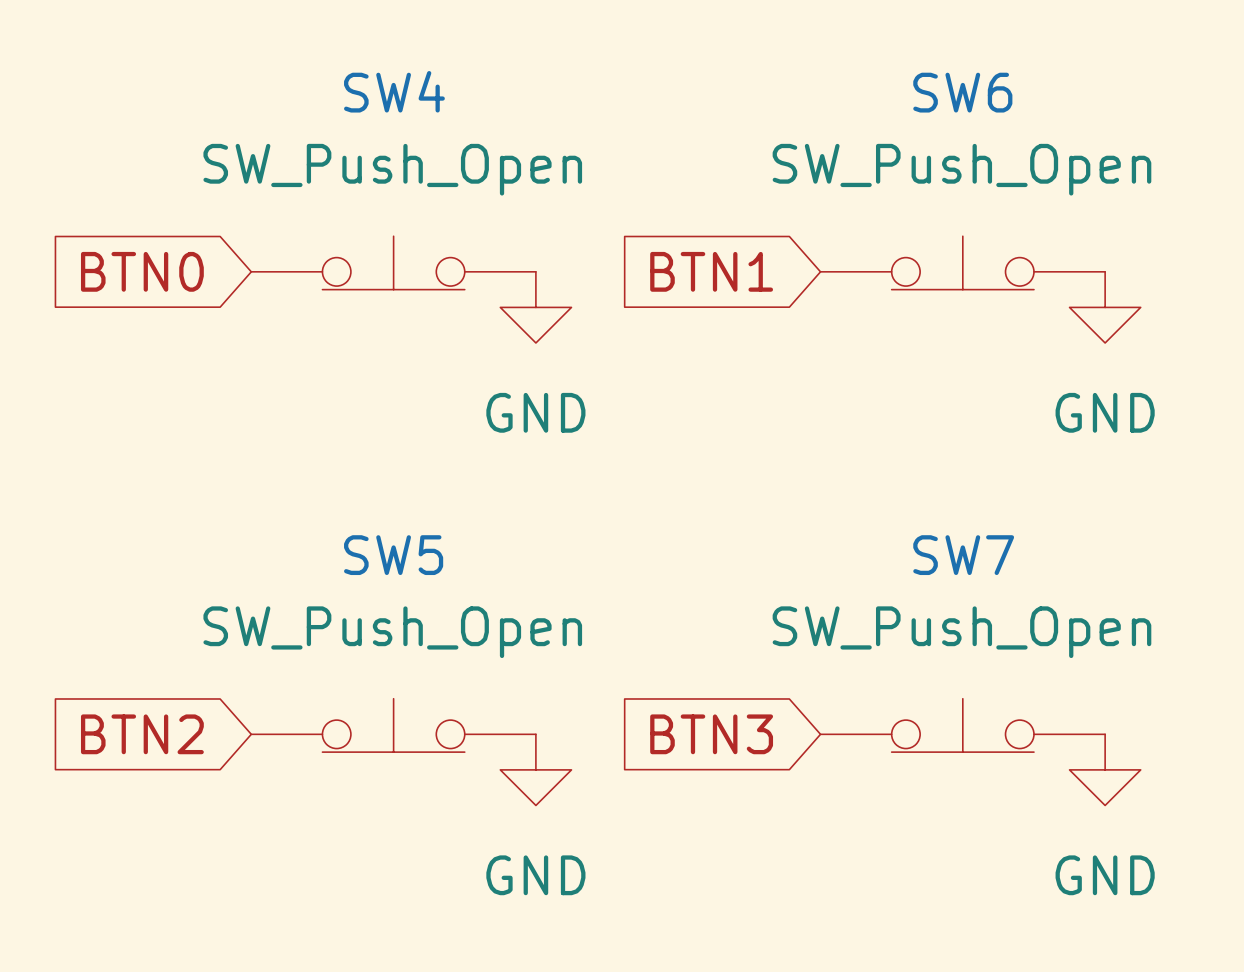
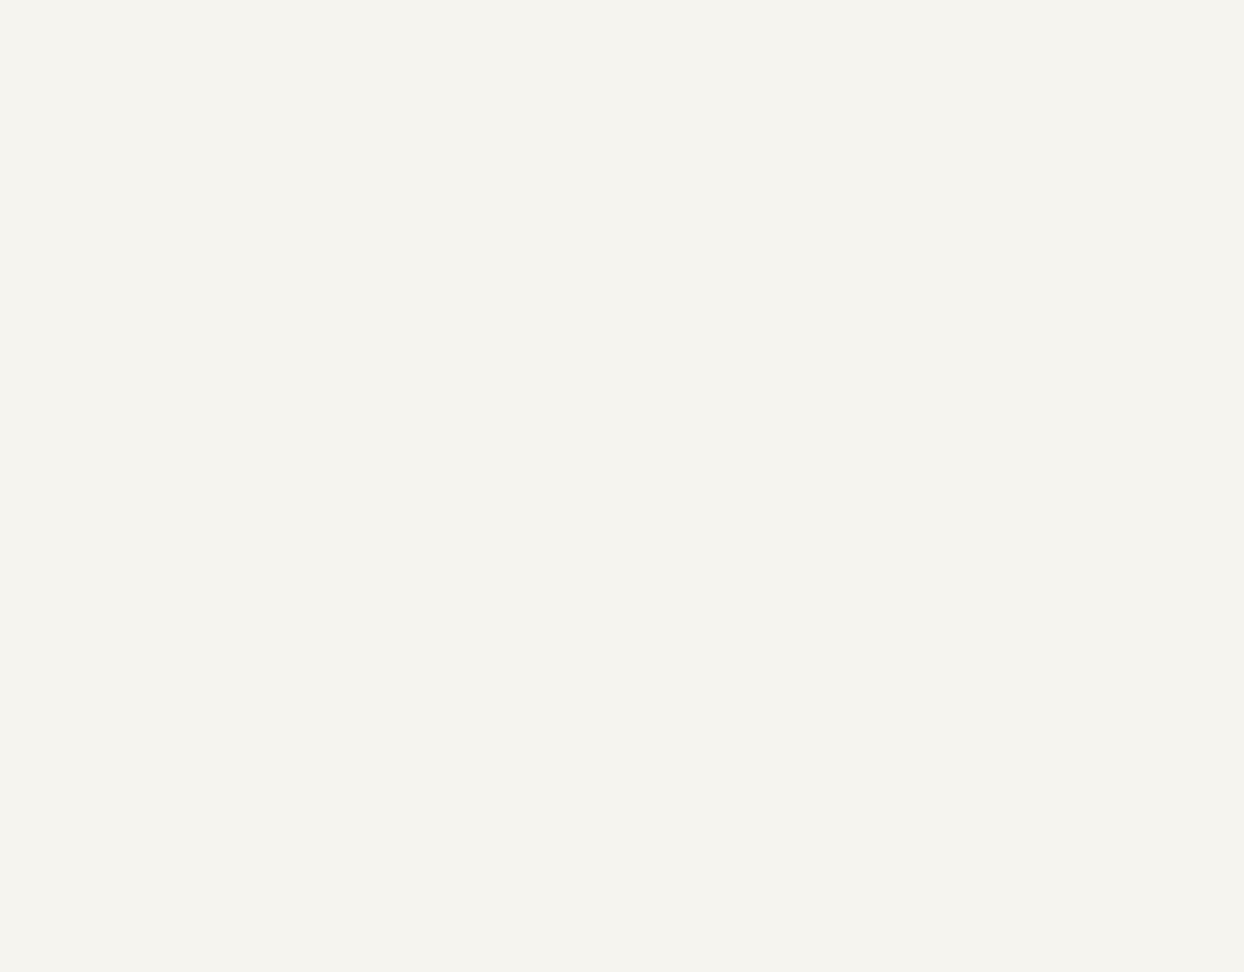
SW4: SW_Push_Open (393, 262) -> none
SW6: SW_Push_Open (962, 262) -> none
global label: BTN0 (142, 271) -> none
global label: BTN1 (711, 271) -> none
power symbol: GND (535, 307) -> none
power symbol: GND (1105, 307) -> none
SW5: SW_Push_Open (393, 725) -> none
SW7: SW_Push_Open (962, 725) -> none
global label: BTN2 (142, 734) -> none
global label: BTN3 (711, 734) -> none
power symbol: GND (535, 769) -> none
power symbol: GND (1105, 769) -> none

